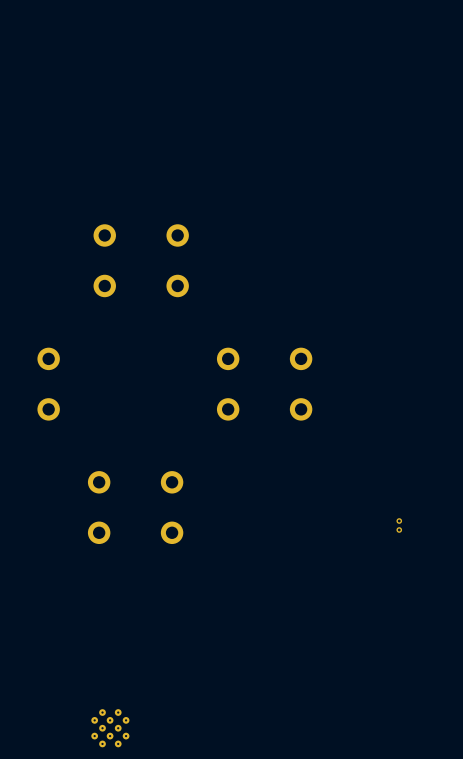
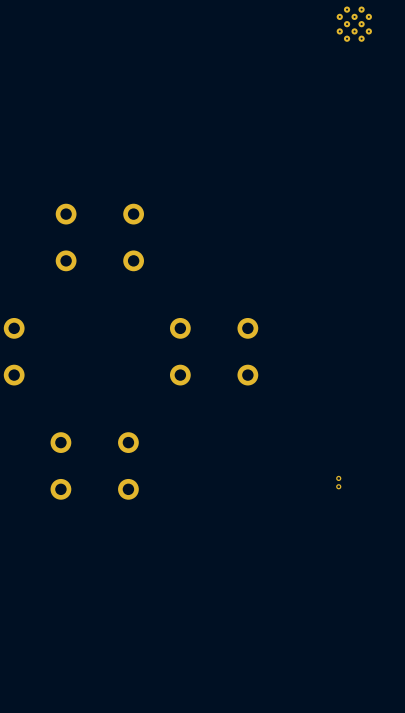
part: none -> (354, 24)
part: (110, 728) -> none

